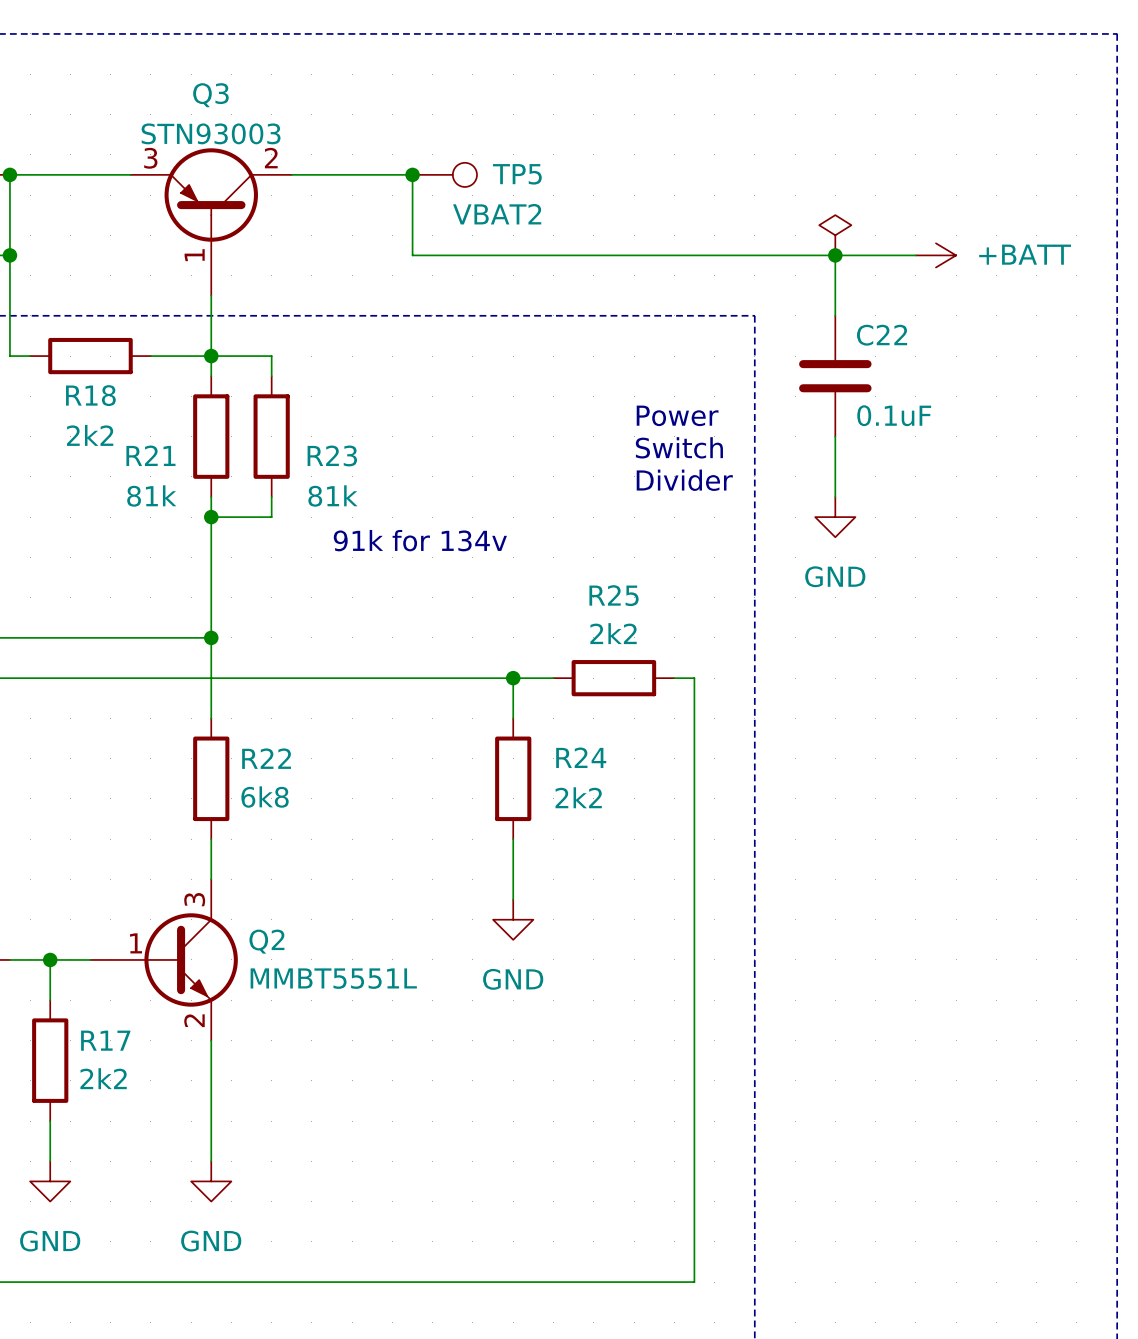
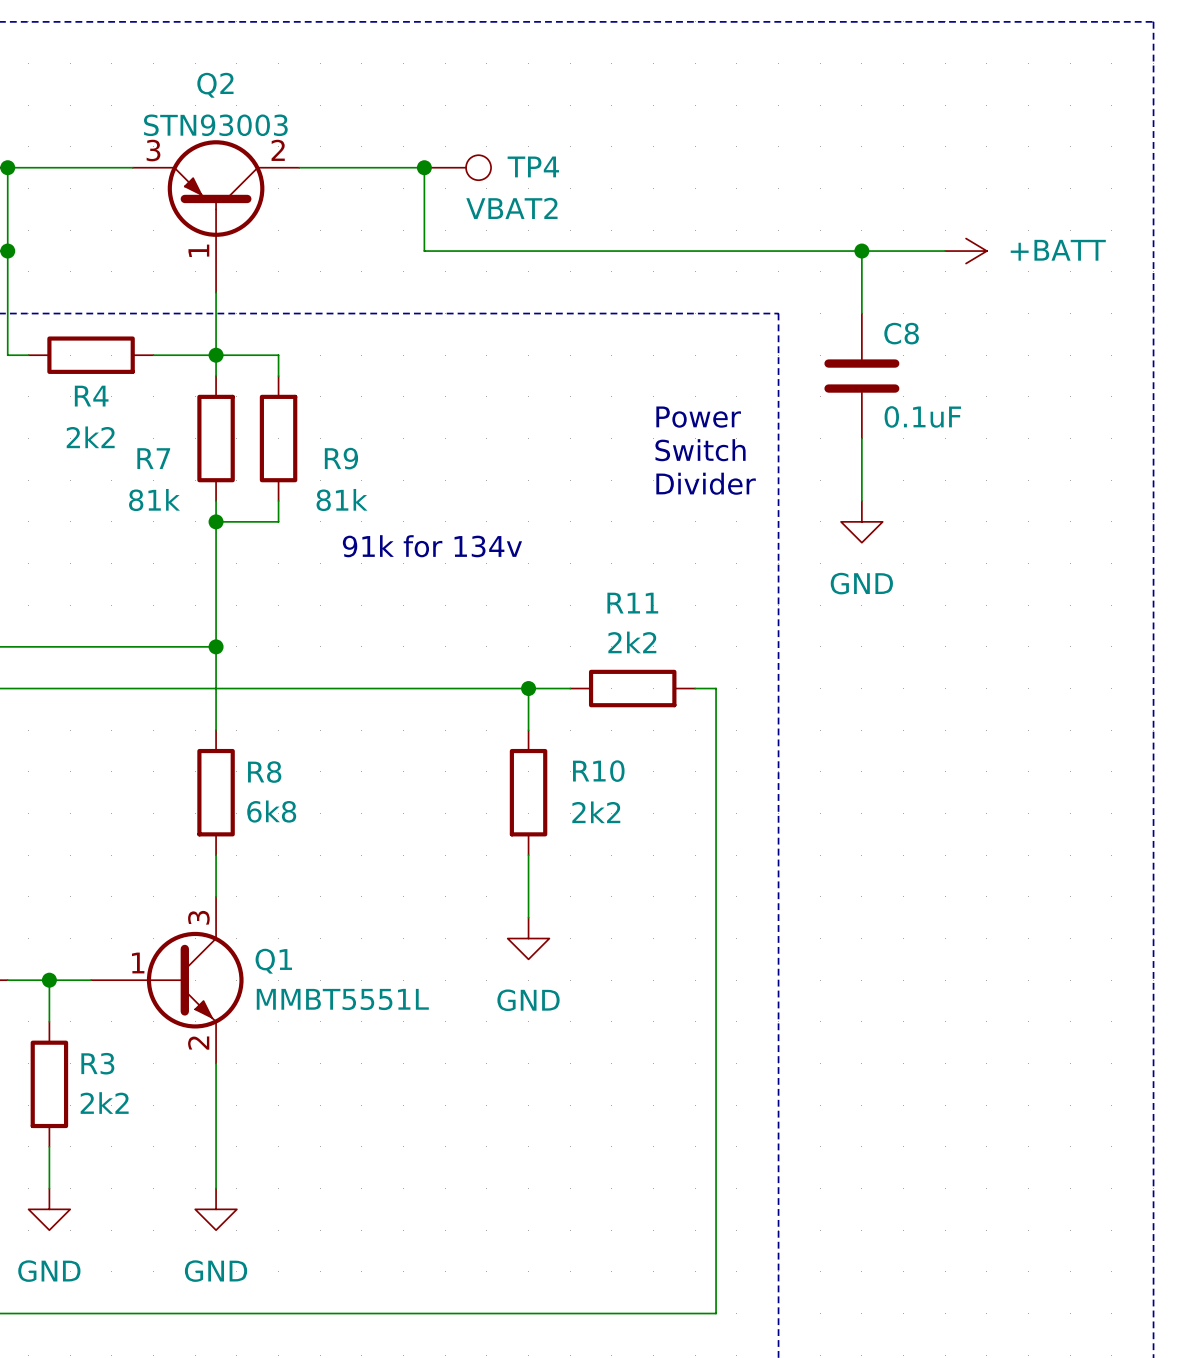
Q3 name: Q3 (210, 95) -> Q2 (215, 85)
TP5 name: TP5 (517, 174) -> TP4 (533, 166)
power symbol: (835, 235) -> none
C22 name: C22 (882, 335) -> C8 (901, 333)
R18 name: R18 (90, 395) -> R4 (91, 396)
R21 name: R21 (150, 455) -> R7 (153, 458)
R23 name: R23 (332, 455) -> R9 (341, 458)
R25 name: R25 (614, 595) -> R11 (632, 603)
R24 name: R24 (581, 757) -> R10 (598, 771)
R22 name: R22 (266, 758) -> R8 (264, 772)
Q2 name: Q2 (266, 941) -> Q1 (273, 961)
R17 name: R17 (105, 1040) -> R3 (97, 1063)

